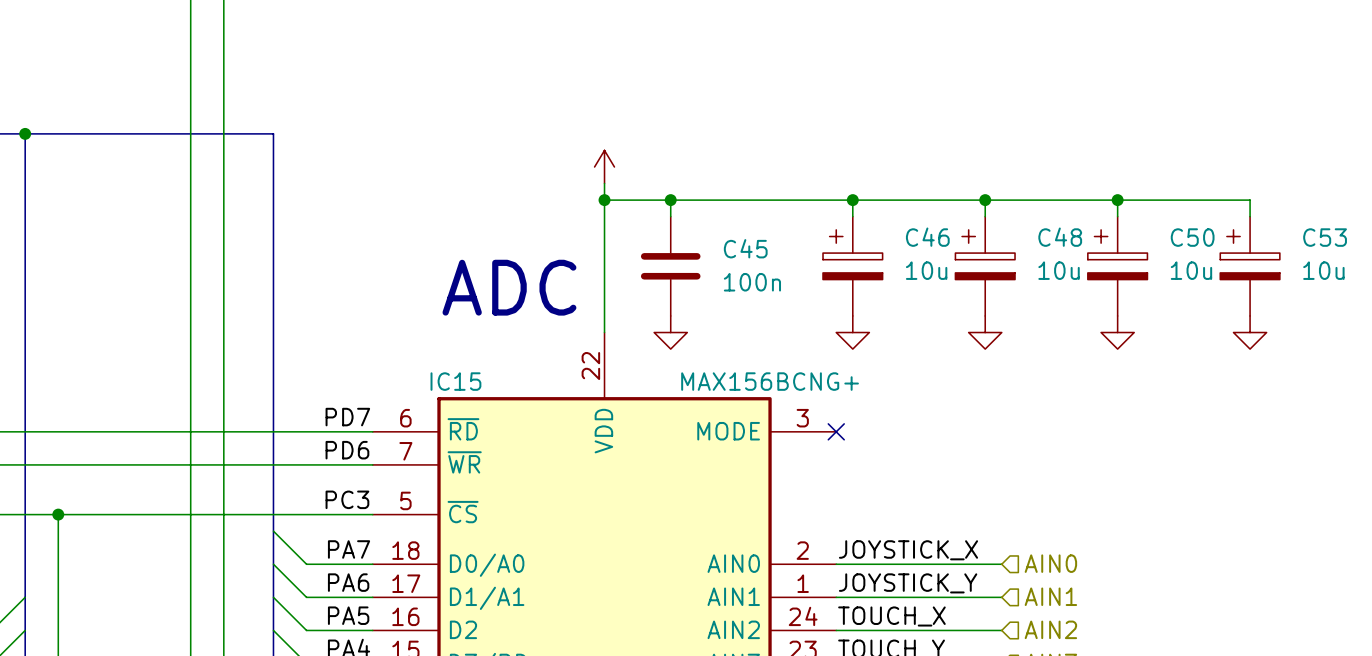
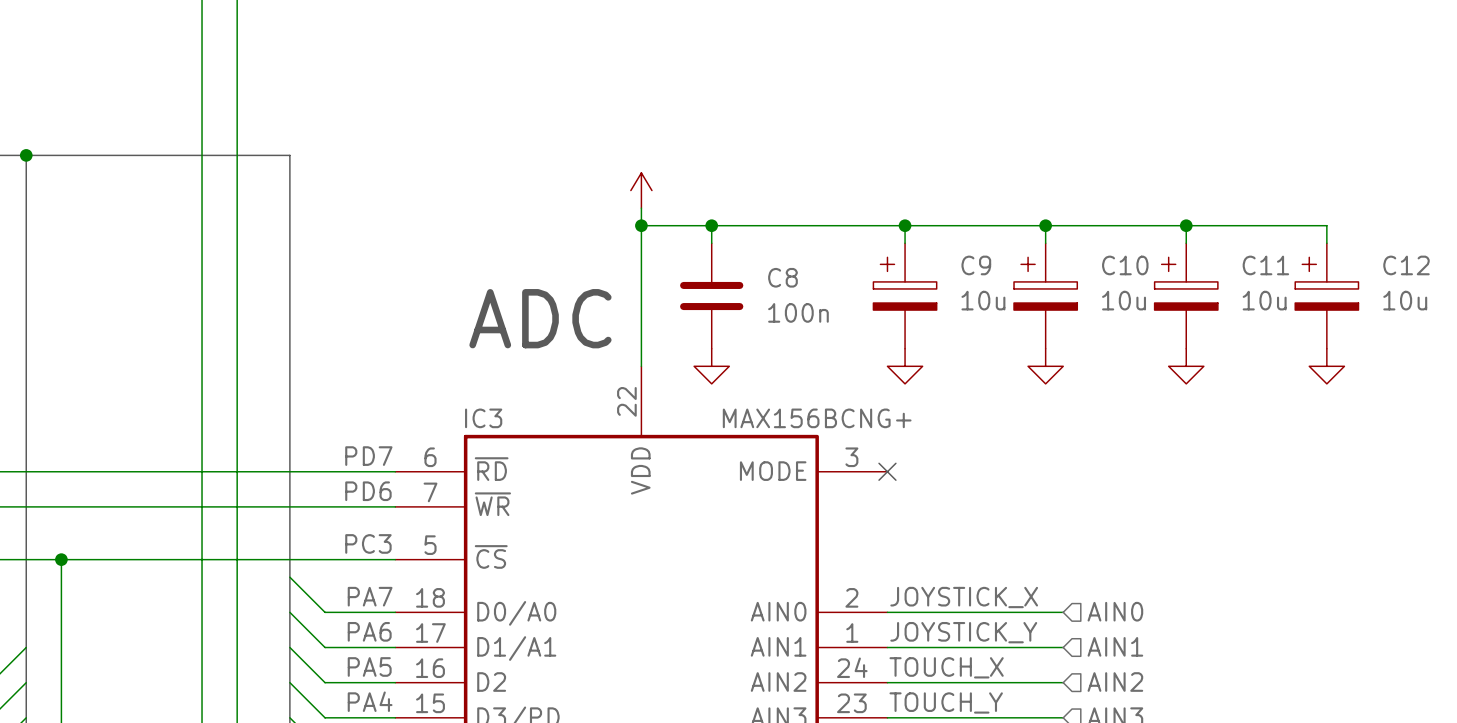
C46 name: C46 (927, 237) -> C9 (976, 265)
C48 name: C48 (1060, 237) -> C10 (1125, 265)
C50 name: C50 (1192, 237) -> C11 (1265, 265)
C53 name: C53 (1325, 237) -> C12 (1406, 265)
C45 name: C45 (745, 248) -> C8 (782, 277)
IC15 name: IC15 (455, 381) -> IC3 (483, 418)

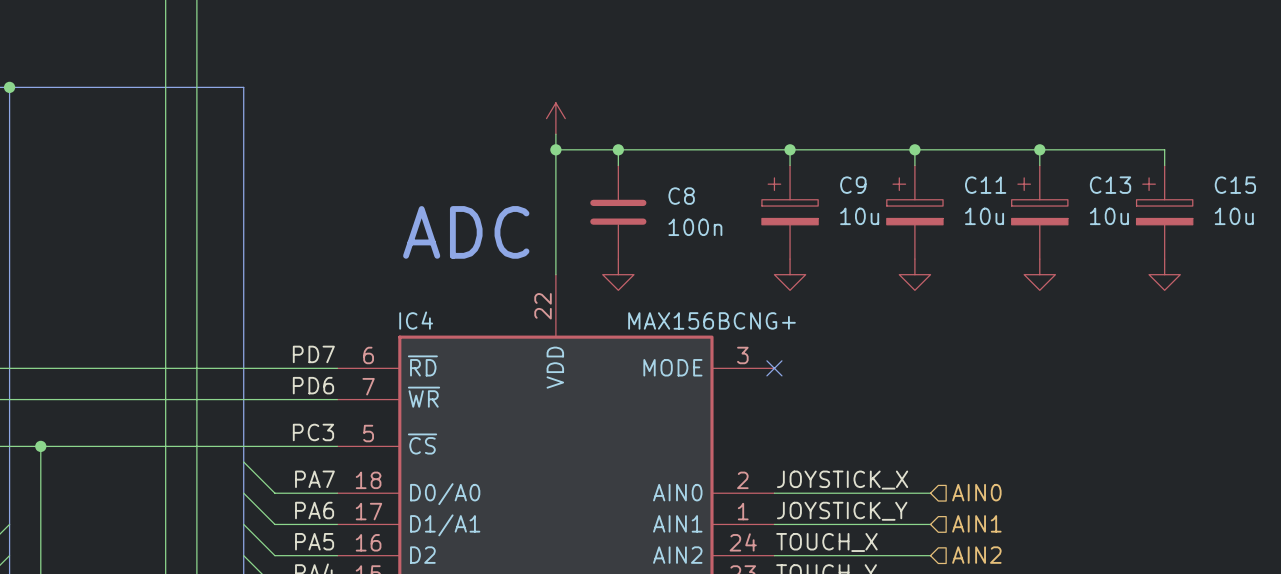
C10 name: C10 (1125, 265) -> C11 (985, 185)
C11 name: C11 (1265, 265) -> C13 (1110, 185)
C12 name: C12 (1406, 265) -> C15 (1235, 185)
IC3 name: IC3 (483, 418) -> IC4 (416, 320)

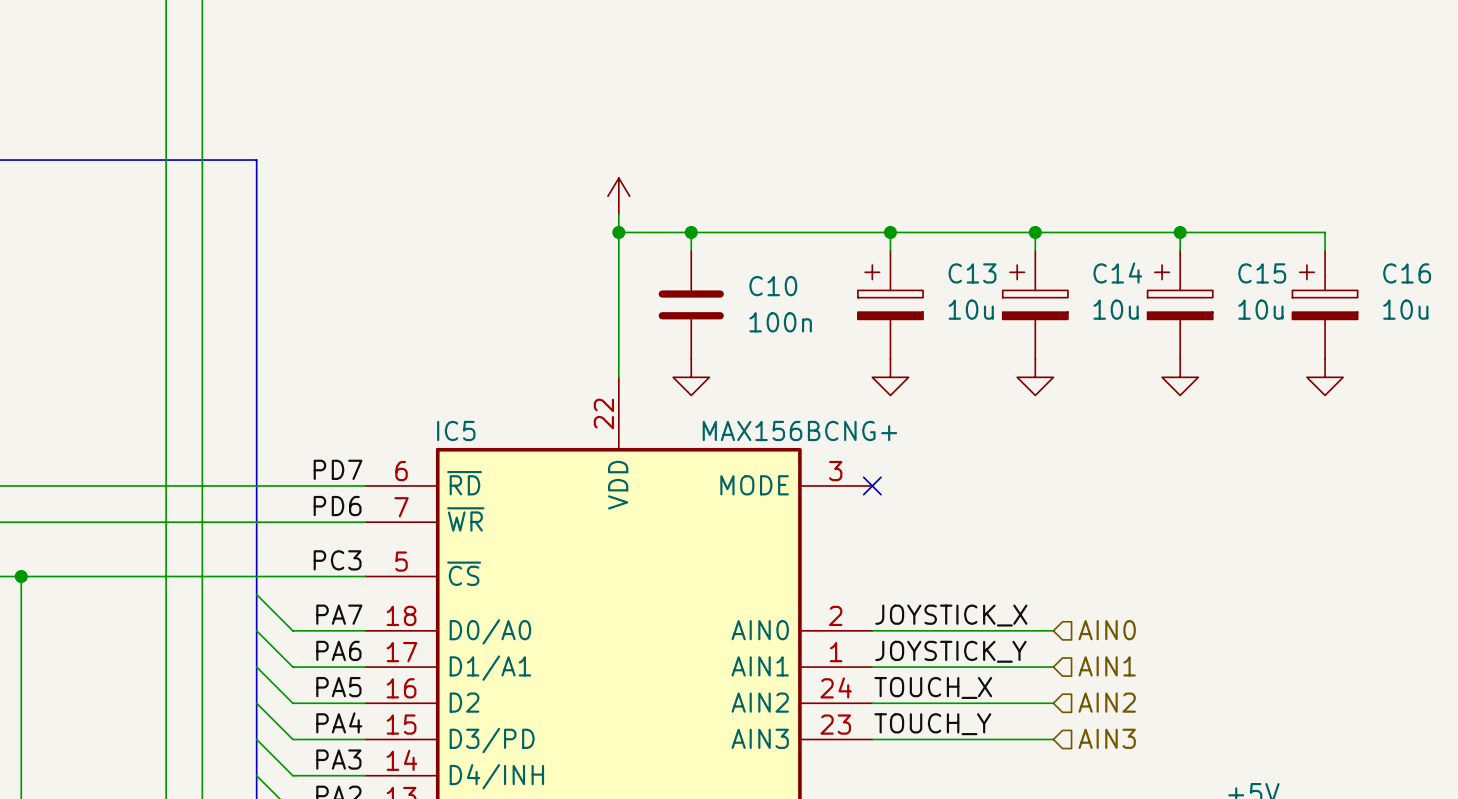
C9 name: C9 (853, 185) -> C13 (972, 273)
C11 name: C11 (985, 185) -> C14 (1117, 273)
C13 name: C13 (1110, 185) -> C15 (1262, 273)
C15 name: C15 (1235, 185) -> C16 (1407, 273)
C8 name: C8 (681, 196) -> C10 (773, 286)
text: ADC (466, 232) -> none
IC4 name: IC4 (416, 320) -> IC5 (456, 430)

